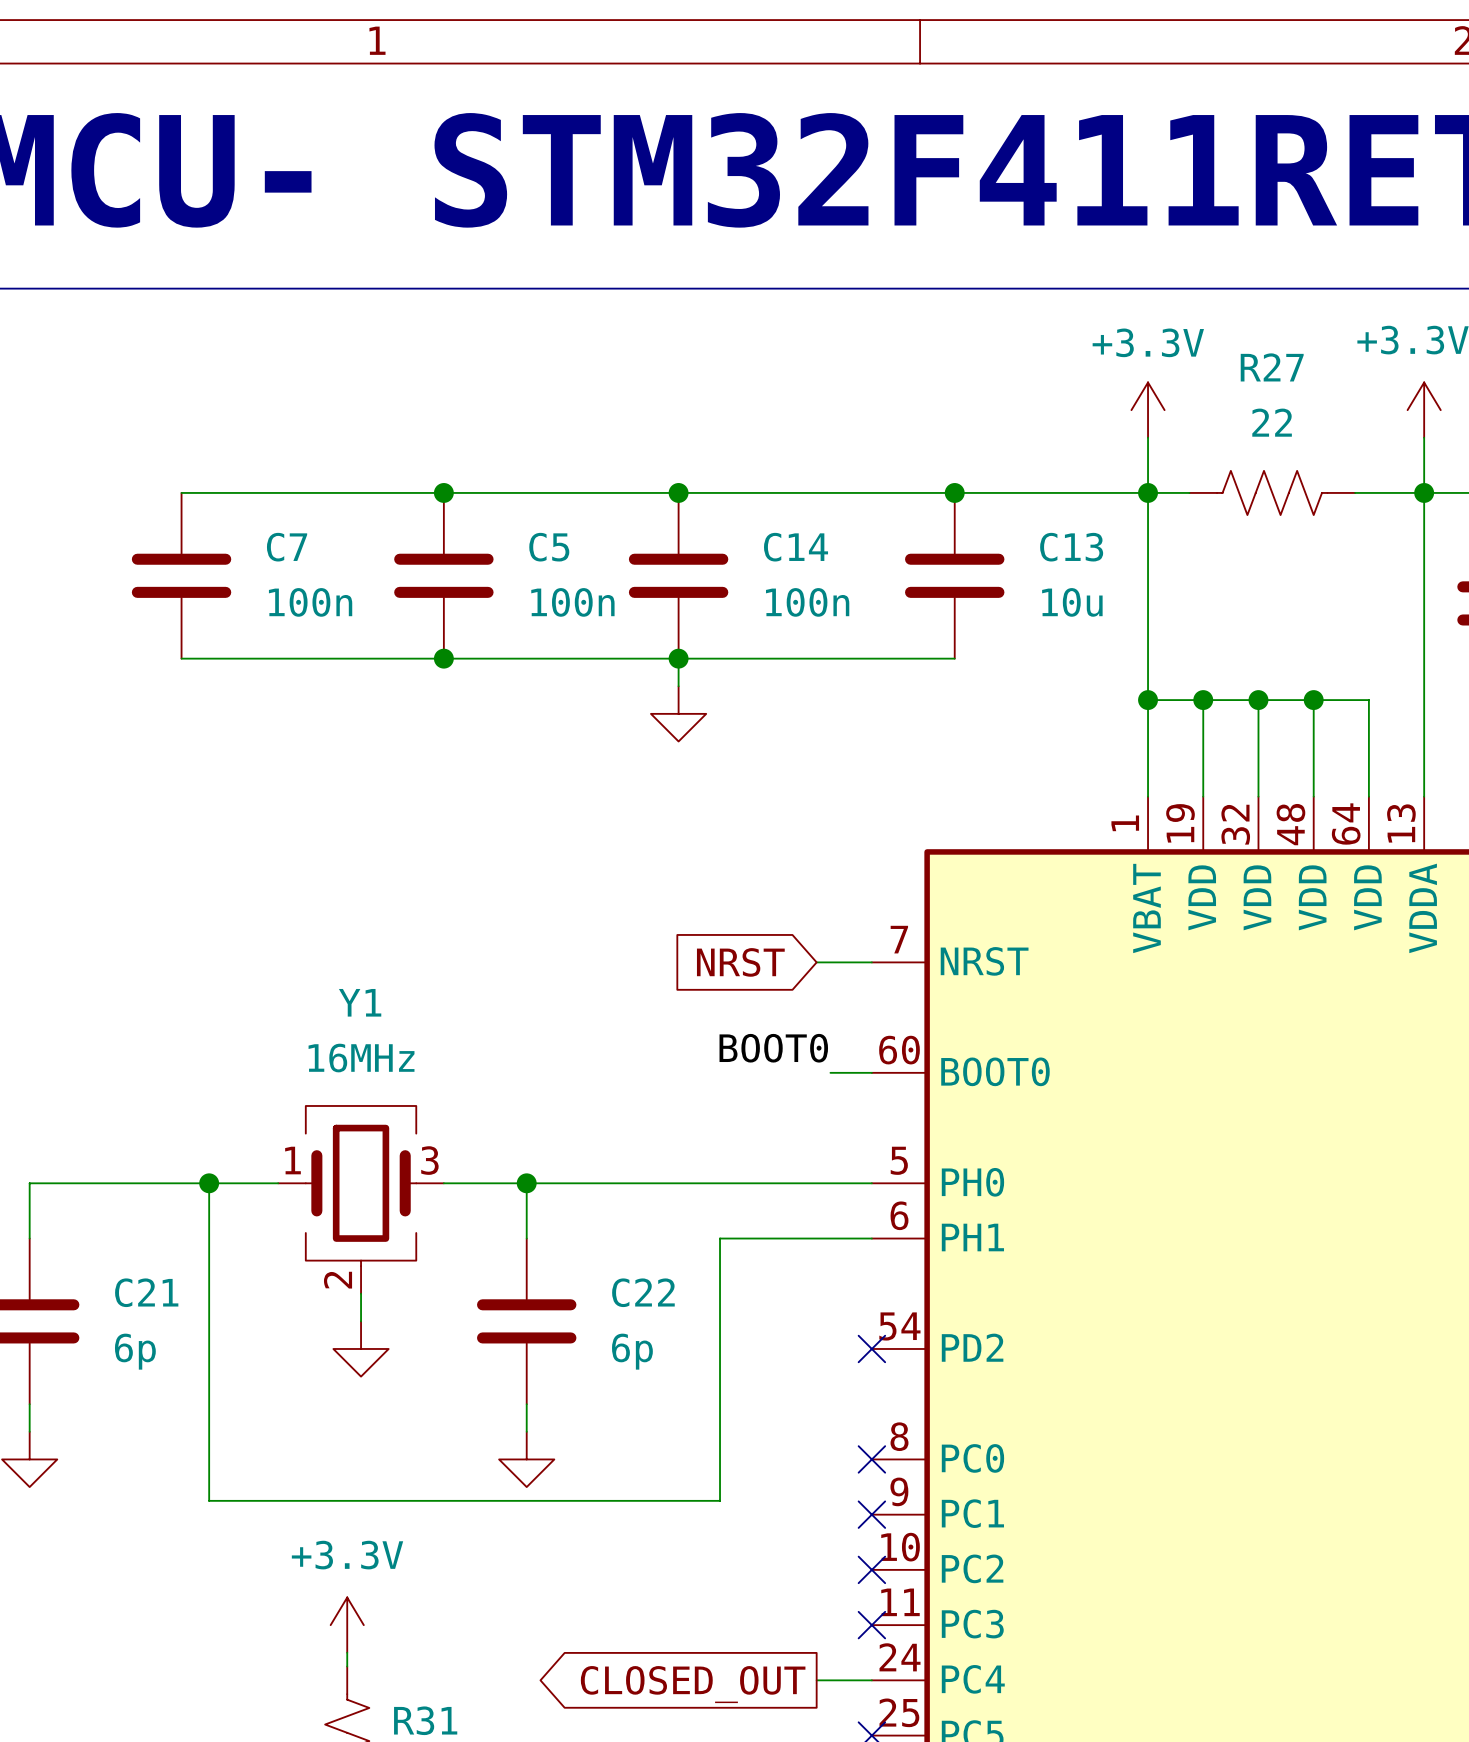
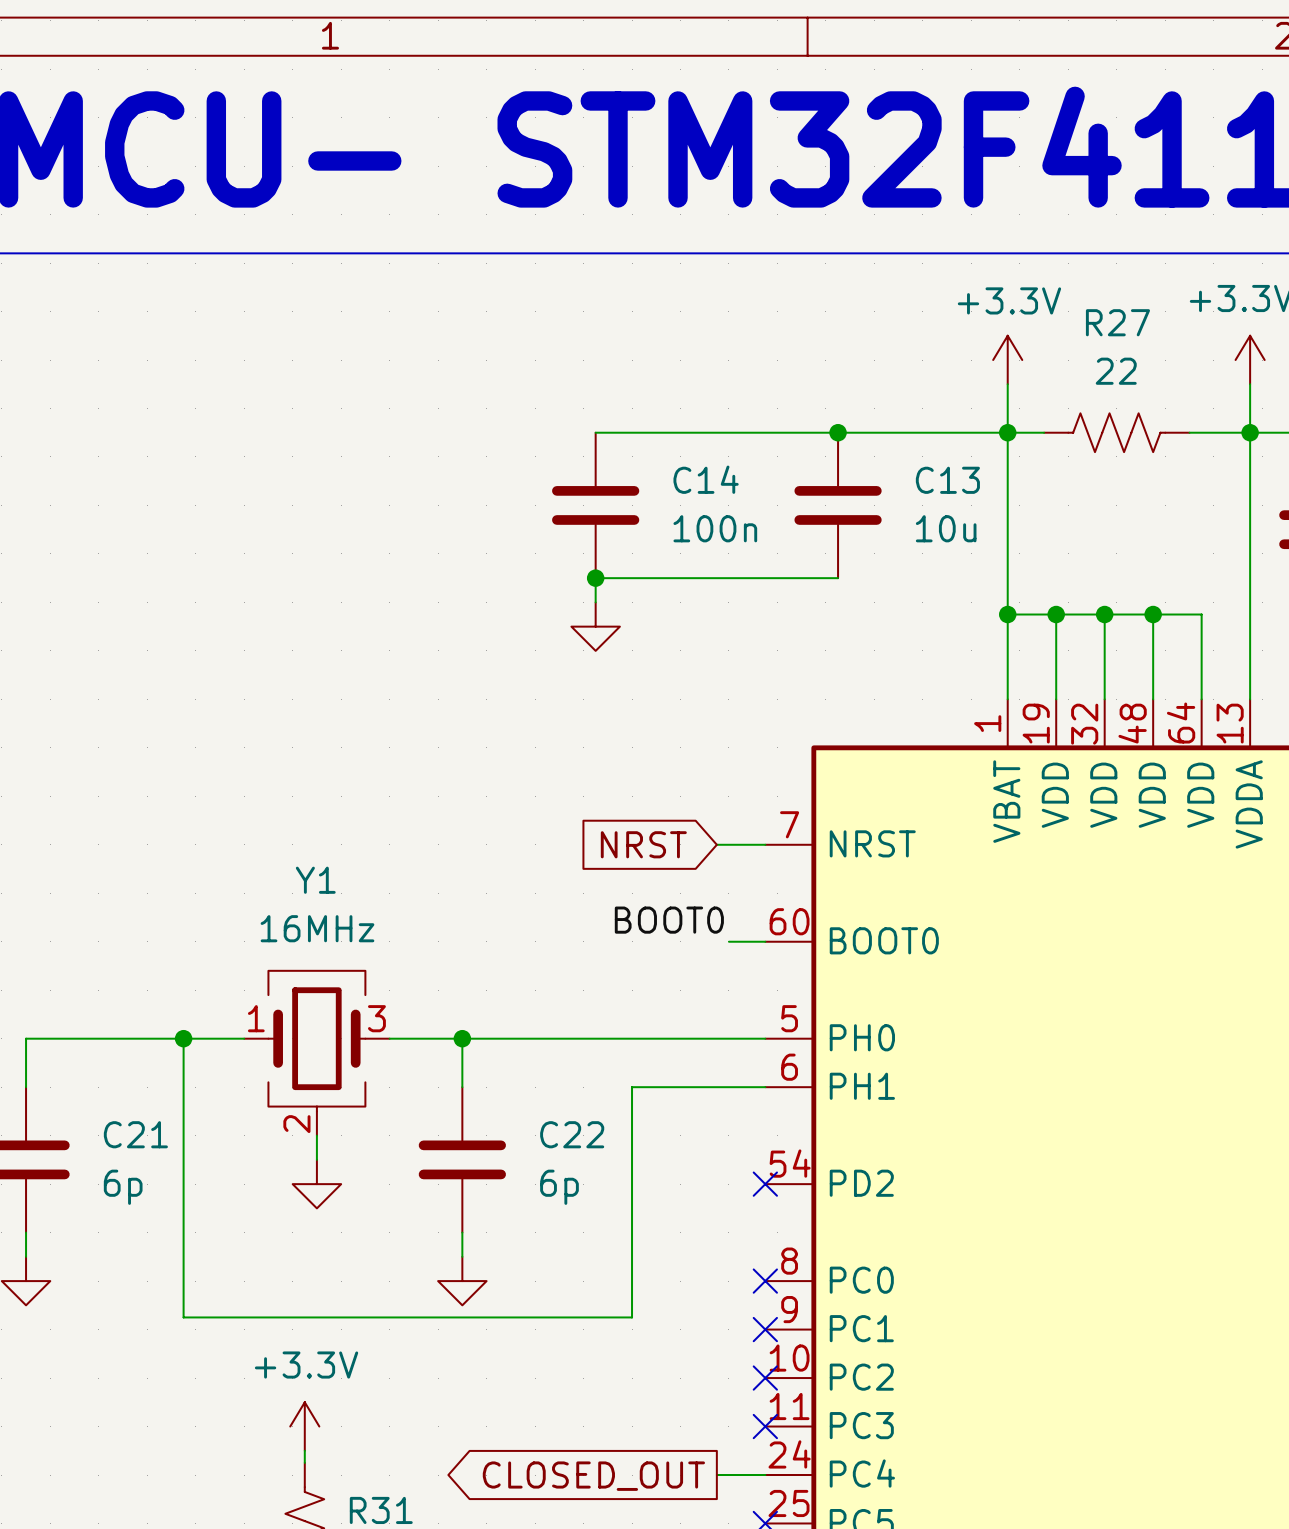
wire: (181, 492) (678, 492) -> none
junction: (443, 492) -> none
junction: (678, 492) -> none
C7: 100n (181, 575) -> none
C5: 100n (443, 575) -> none
wire: (181, 658) (678, 658) -> none
junction: (443, 658) -> none

